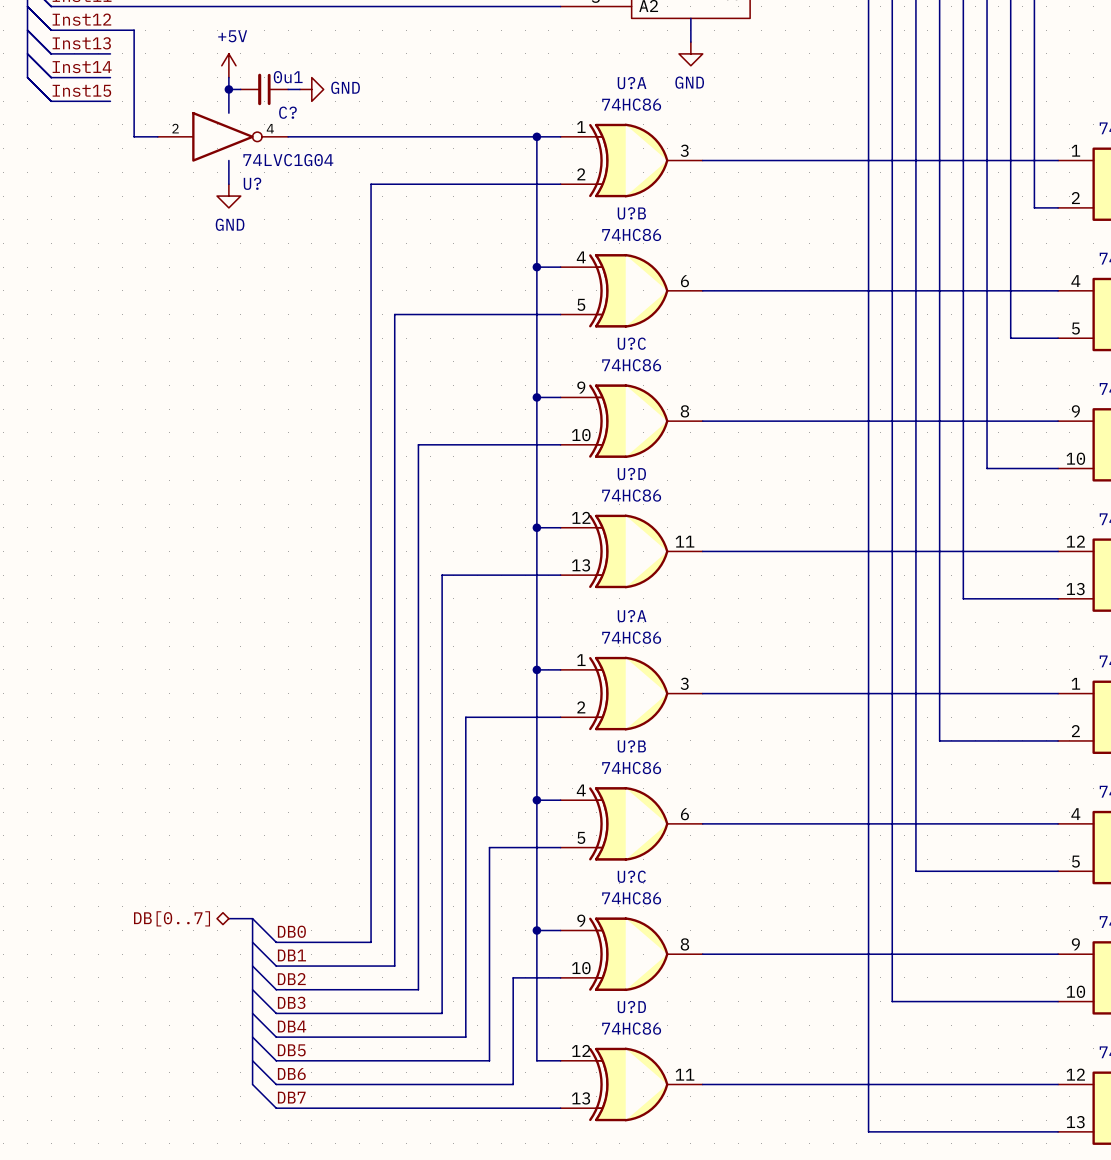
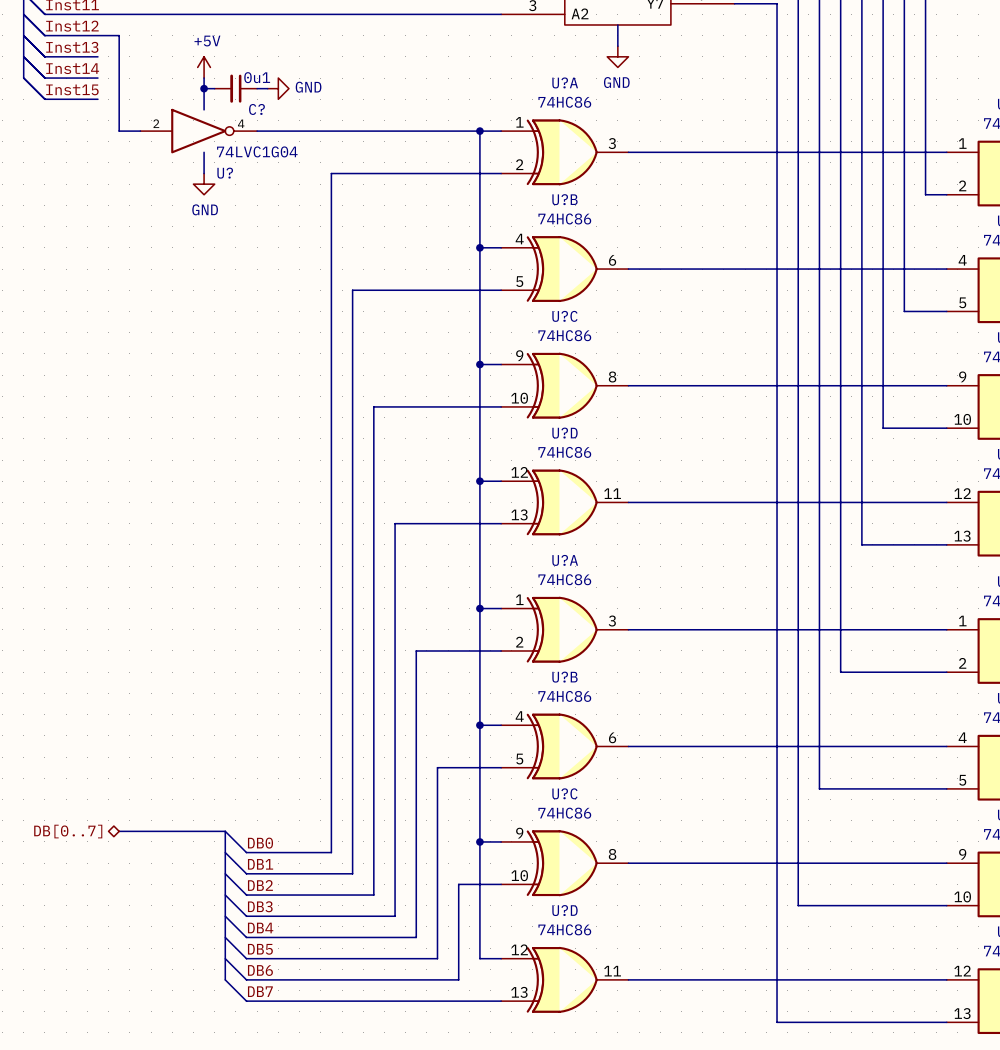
bus: none -> (119, 831) (204, 831)
hierarchical label position: DB[0..7] (172, 918) -> DB[0..7] (68, 831)

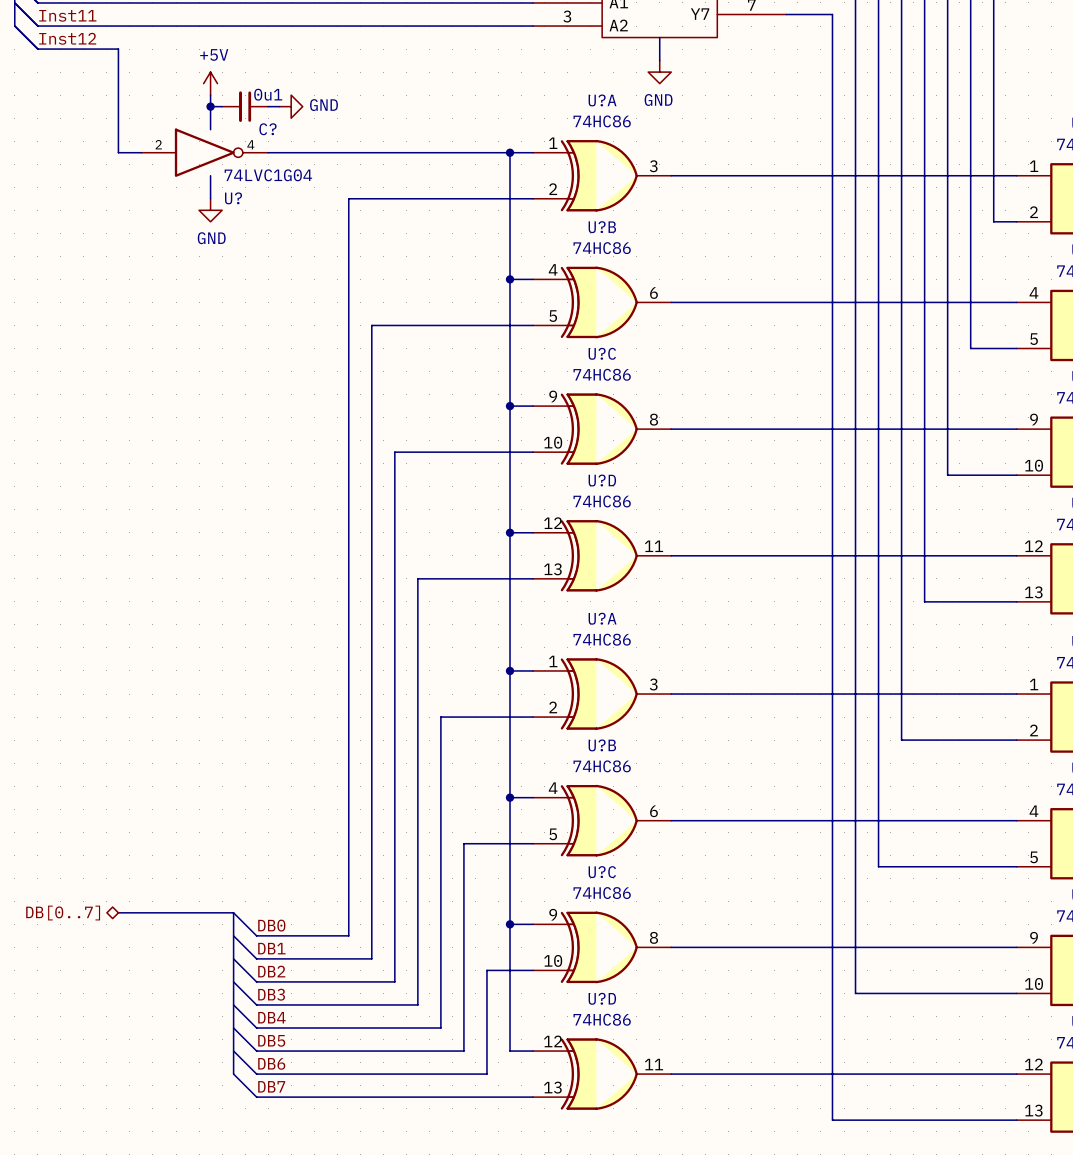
bus: (23, 14) (23, 78) -> none
wire: (23, 35) (44, 56) (97, 56) -> none
label: Inst13 (72, 47) -> none
wire: (23, 56) (44, 78) (97, 78) -> none
label: Inst14 (72, 68) -> none
wire: (23, 78) (44, 99) (97, 99) -> none
label: Inst15 (72, 89) -> none

